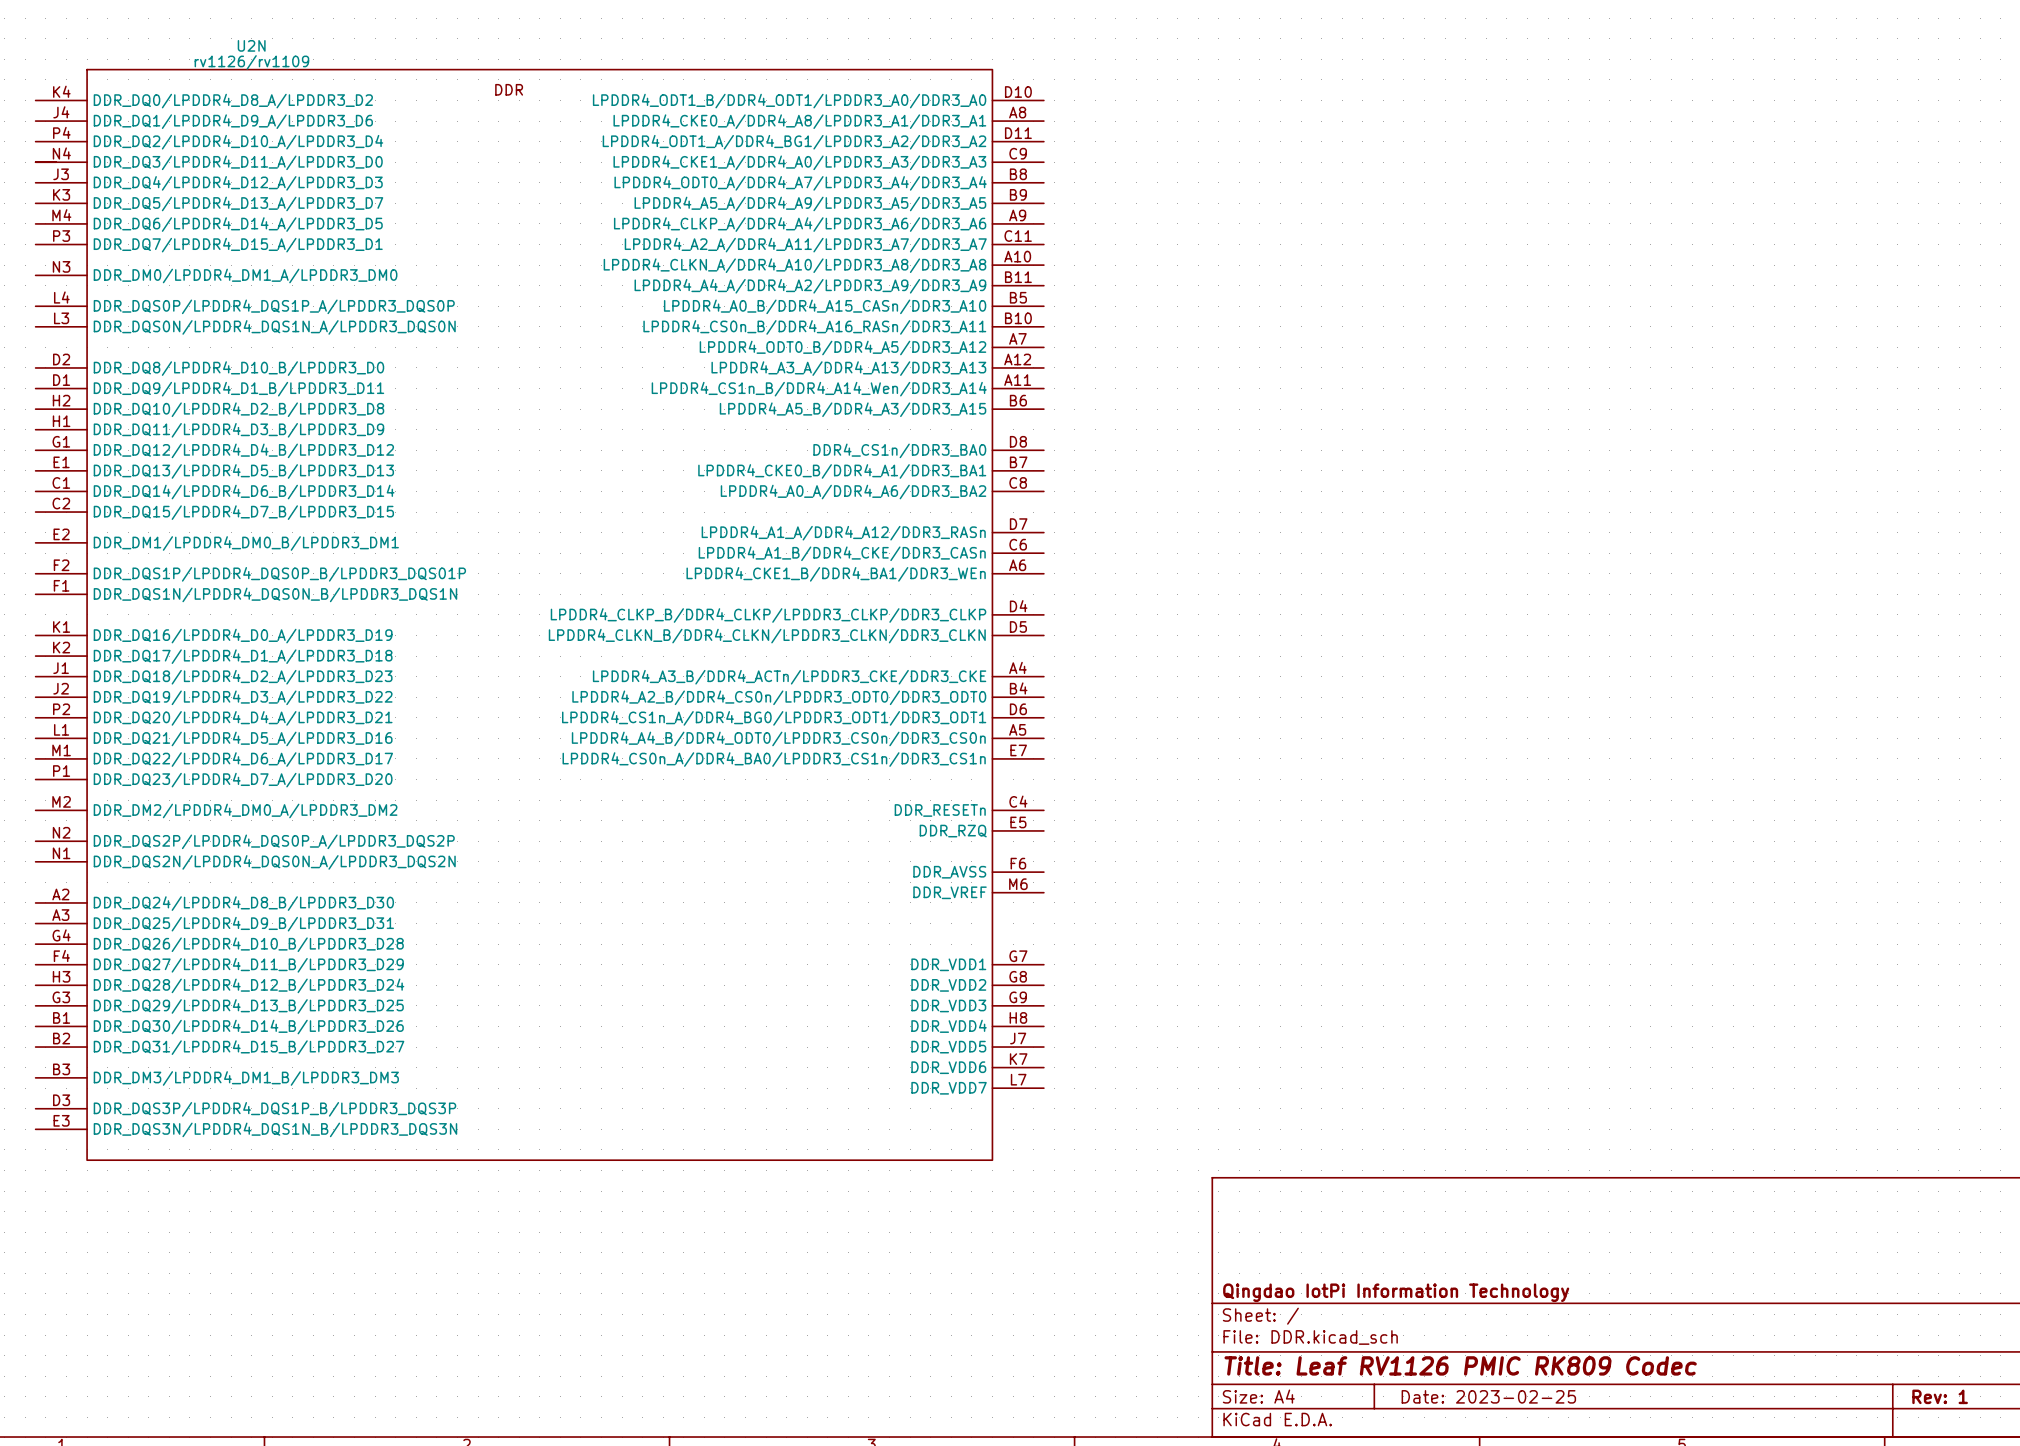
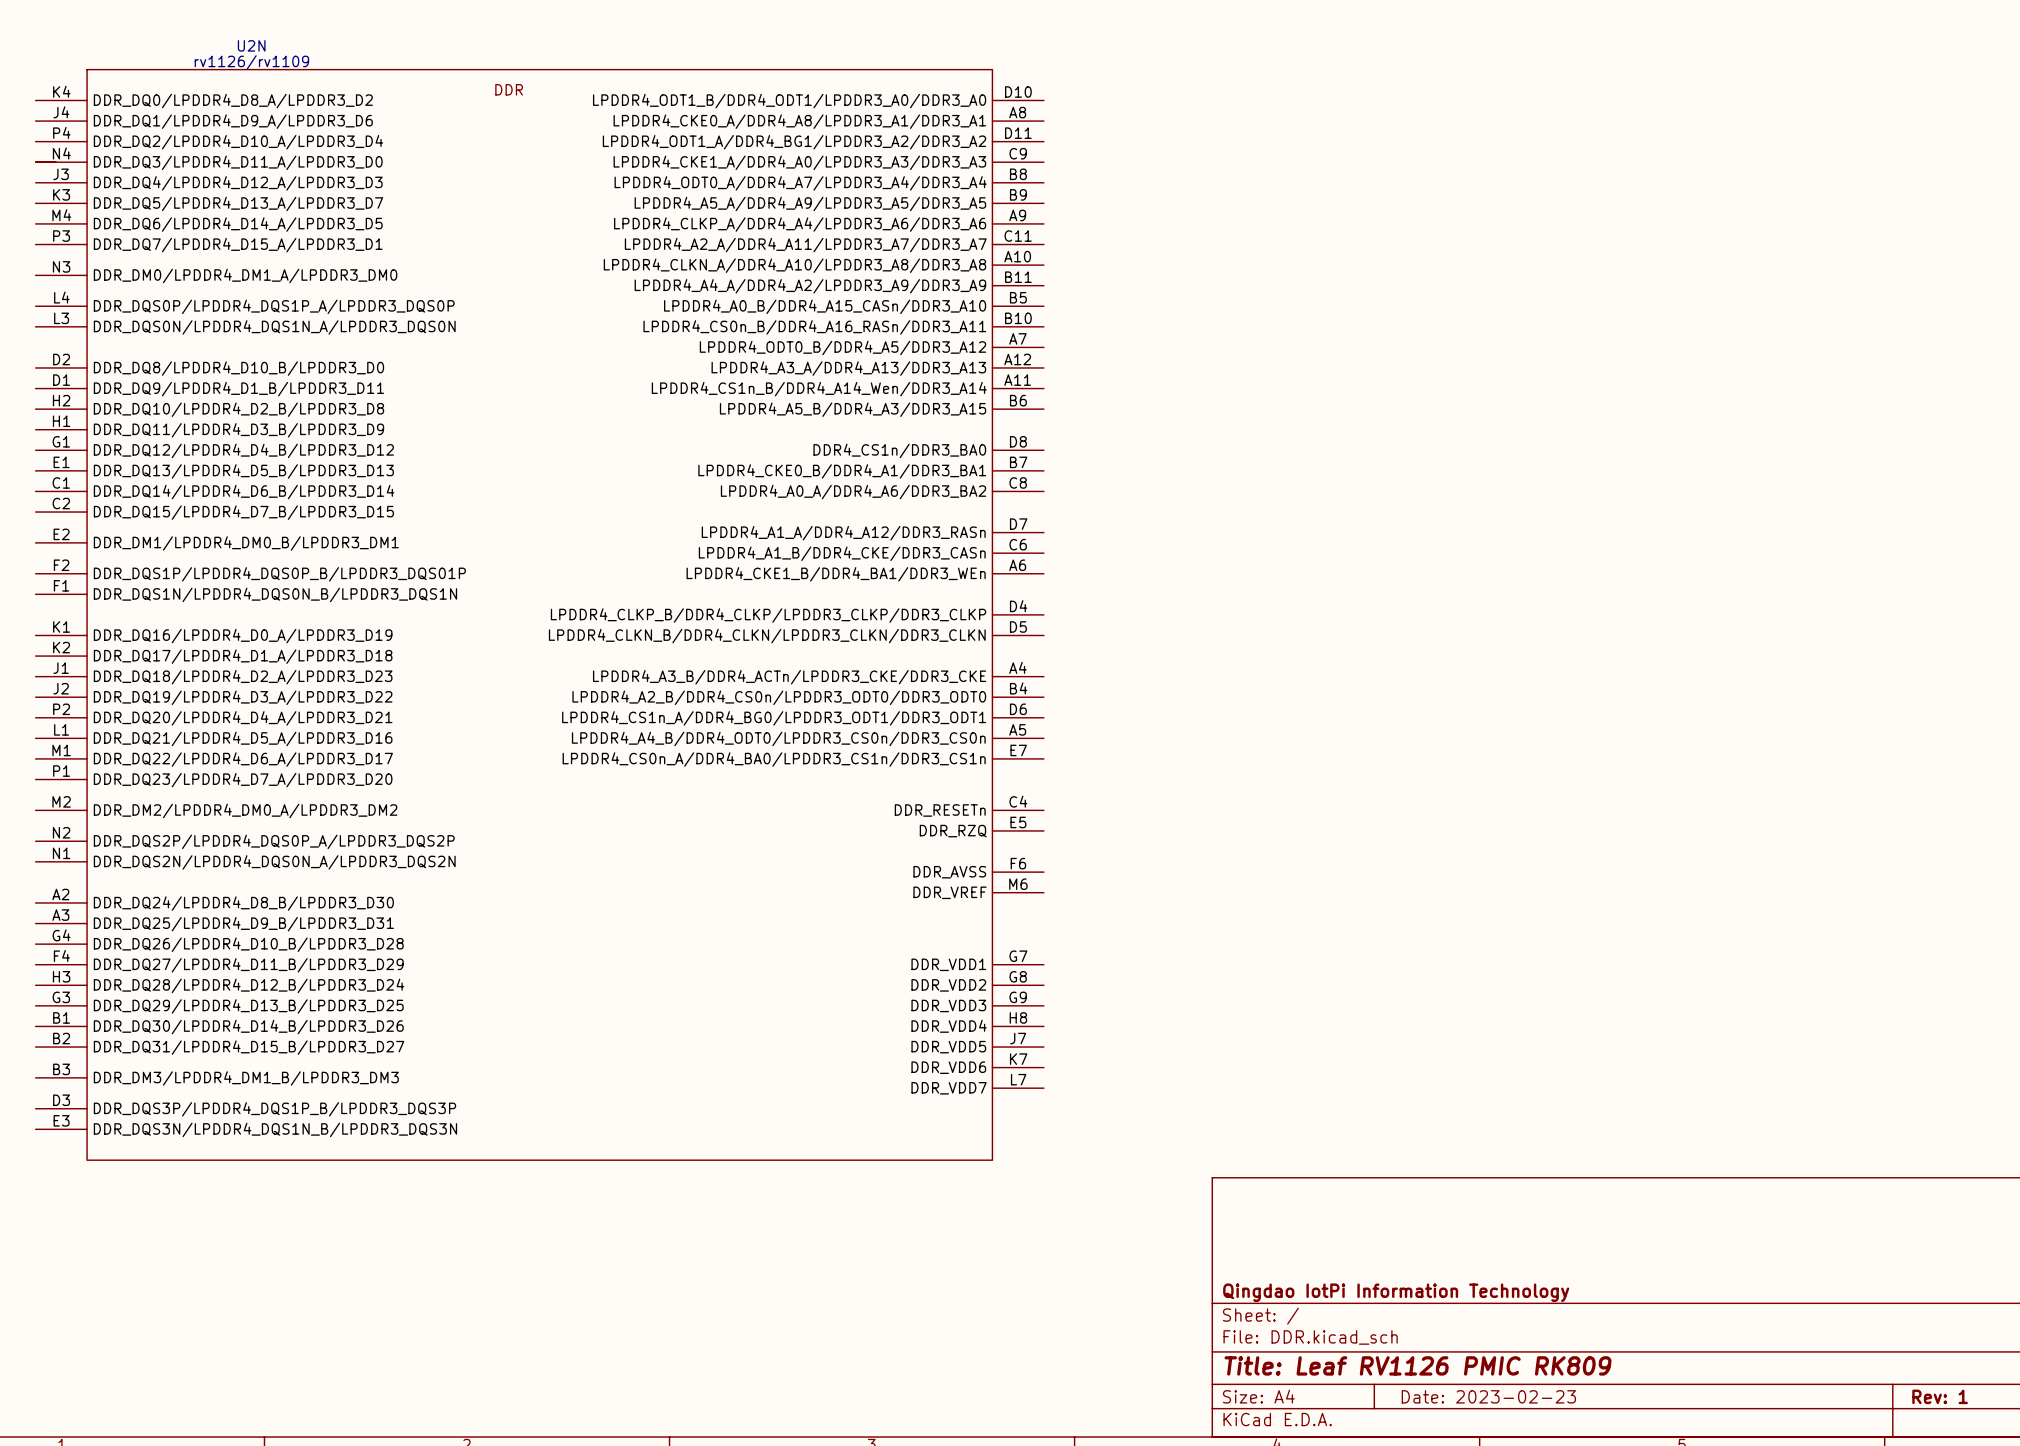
title block: Title: Leaf RV1126 PMIC RK809 Codec (1460, 1365) -> Title: Leaf RV1126 PMIC RK809 (1418, 1365)
title block: Date: 2023-02-25 (1488, 1396) -> Date: 2023-02-23 (1488, 1396)

